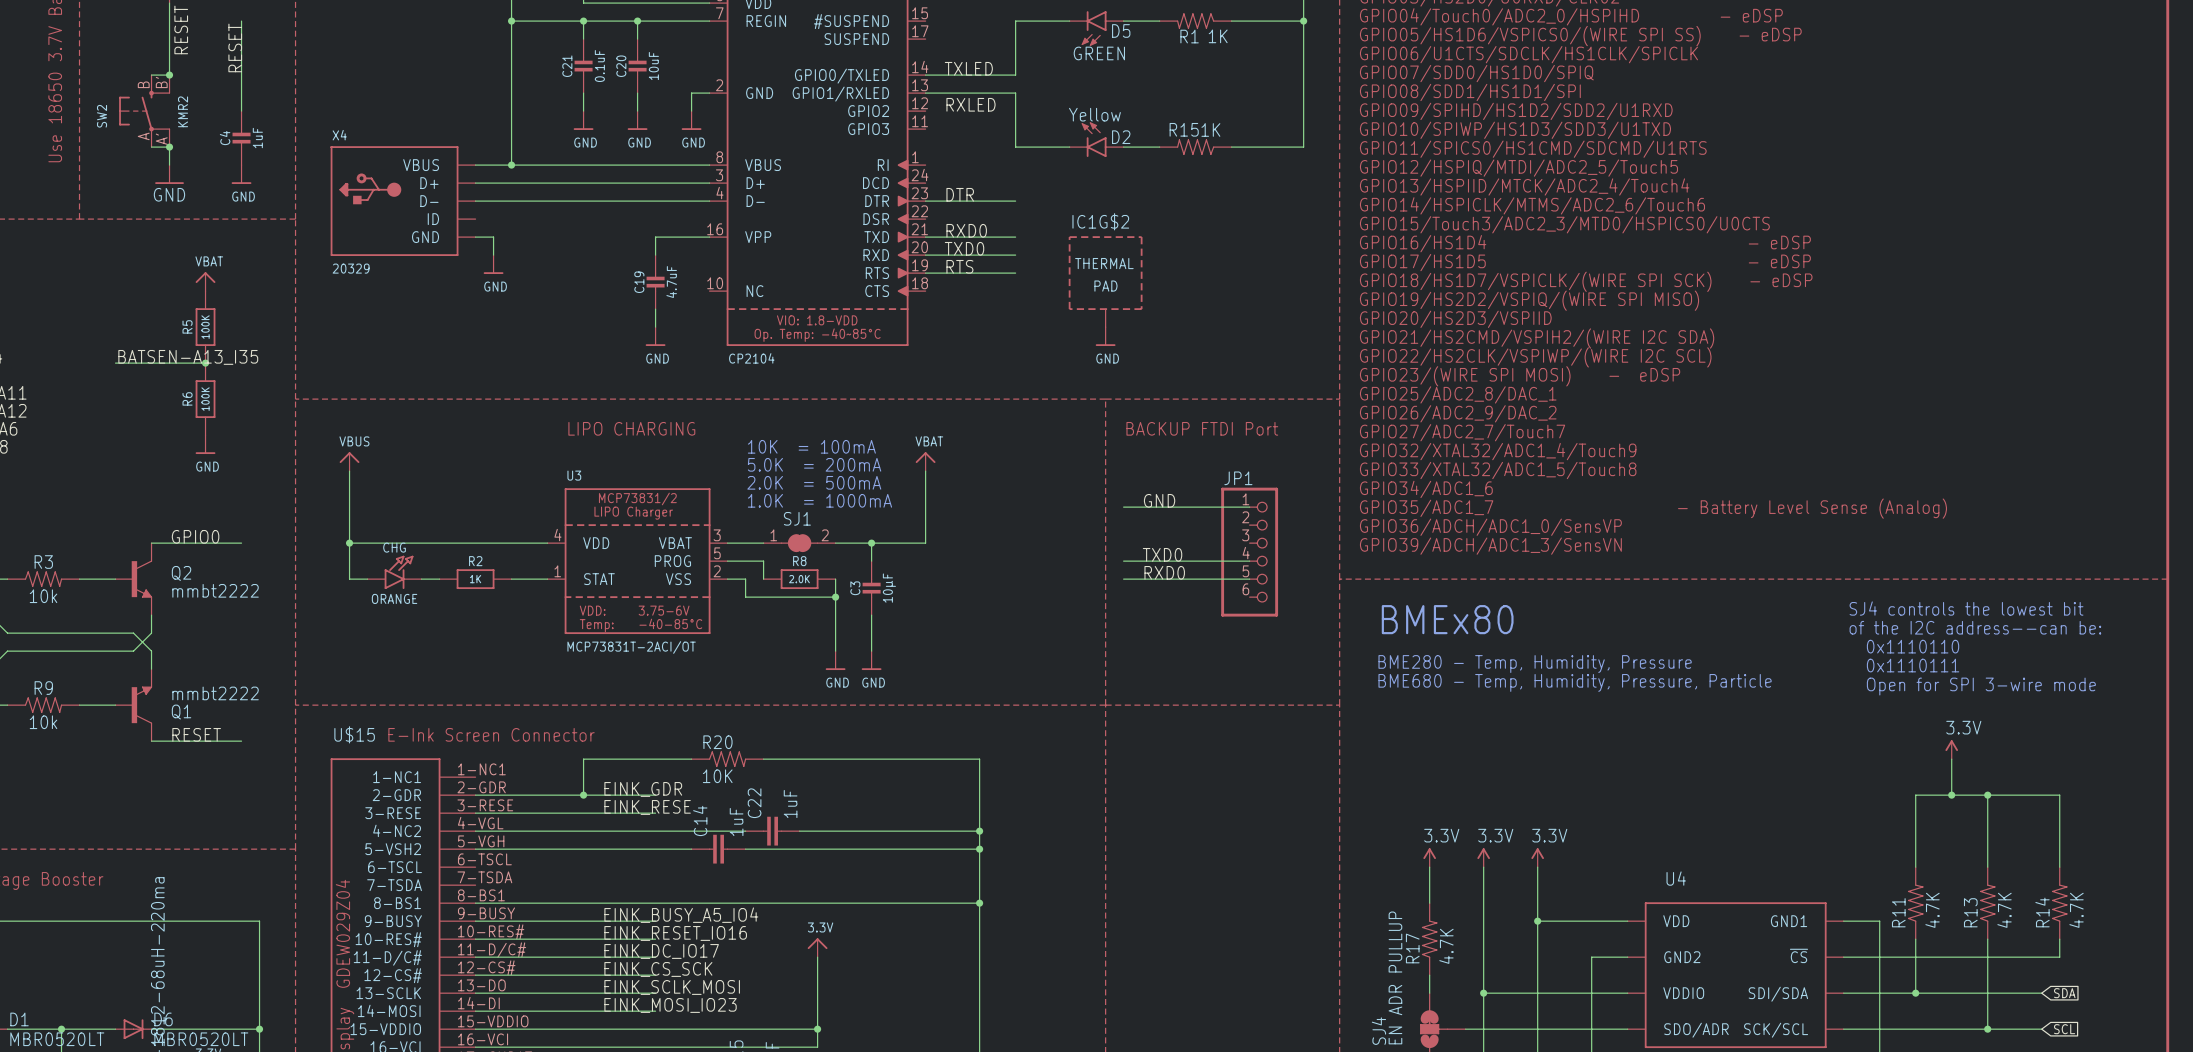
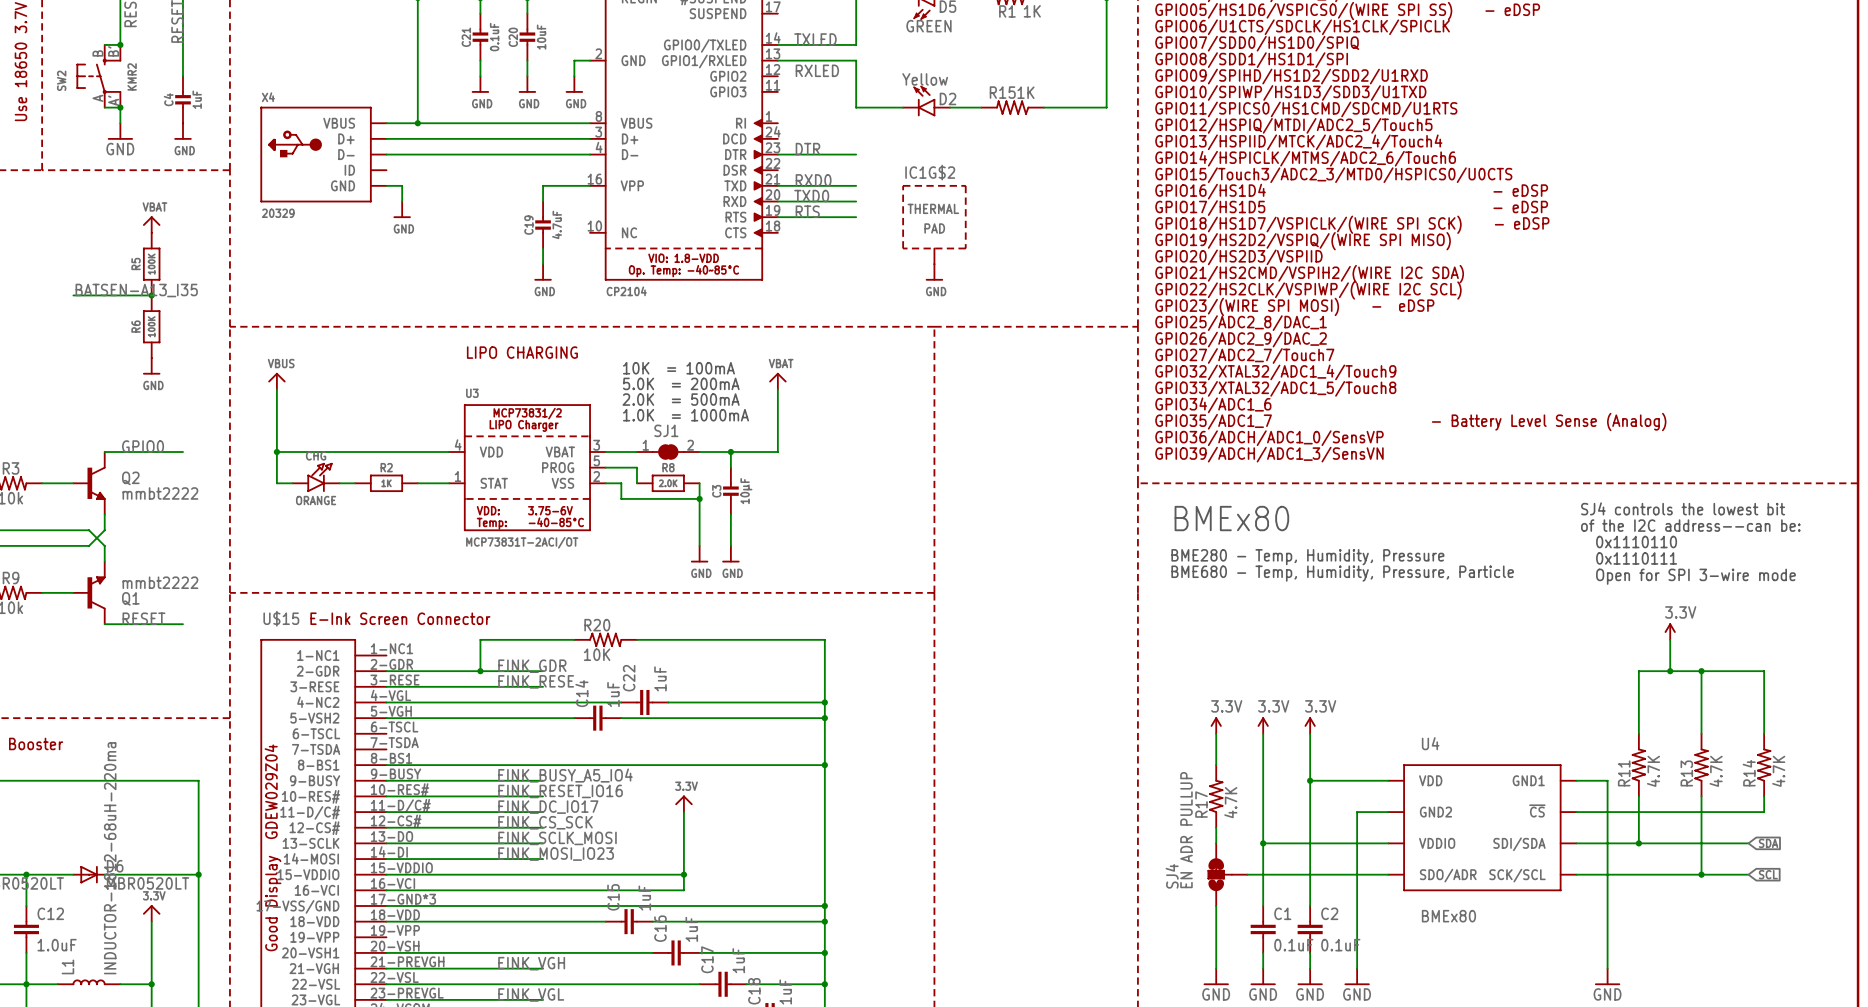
text: BACKUP FTDI Port (1202, 428) -> none
label: GND (1159, 500) -> none
wire: (1123, 507) (1249, 507) -> none
JP1: (1249, 552) -> none
label: TXD0 (1162, 554) -> none
wire: (1123, 561) (1249, 561) -> none
label: RXD0 (1164, 572) -> none
wire: (1123, 579) (1249, 579) -> none
line: (1105, 705) (1339, 705) -> none

